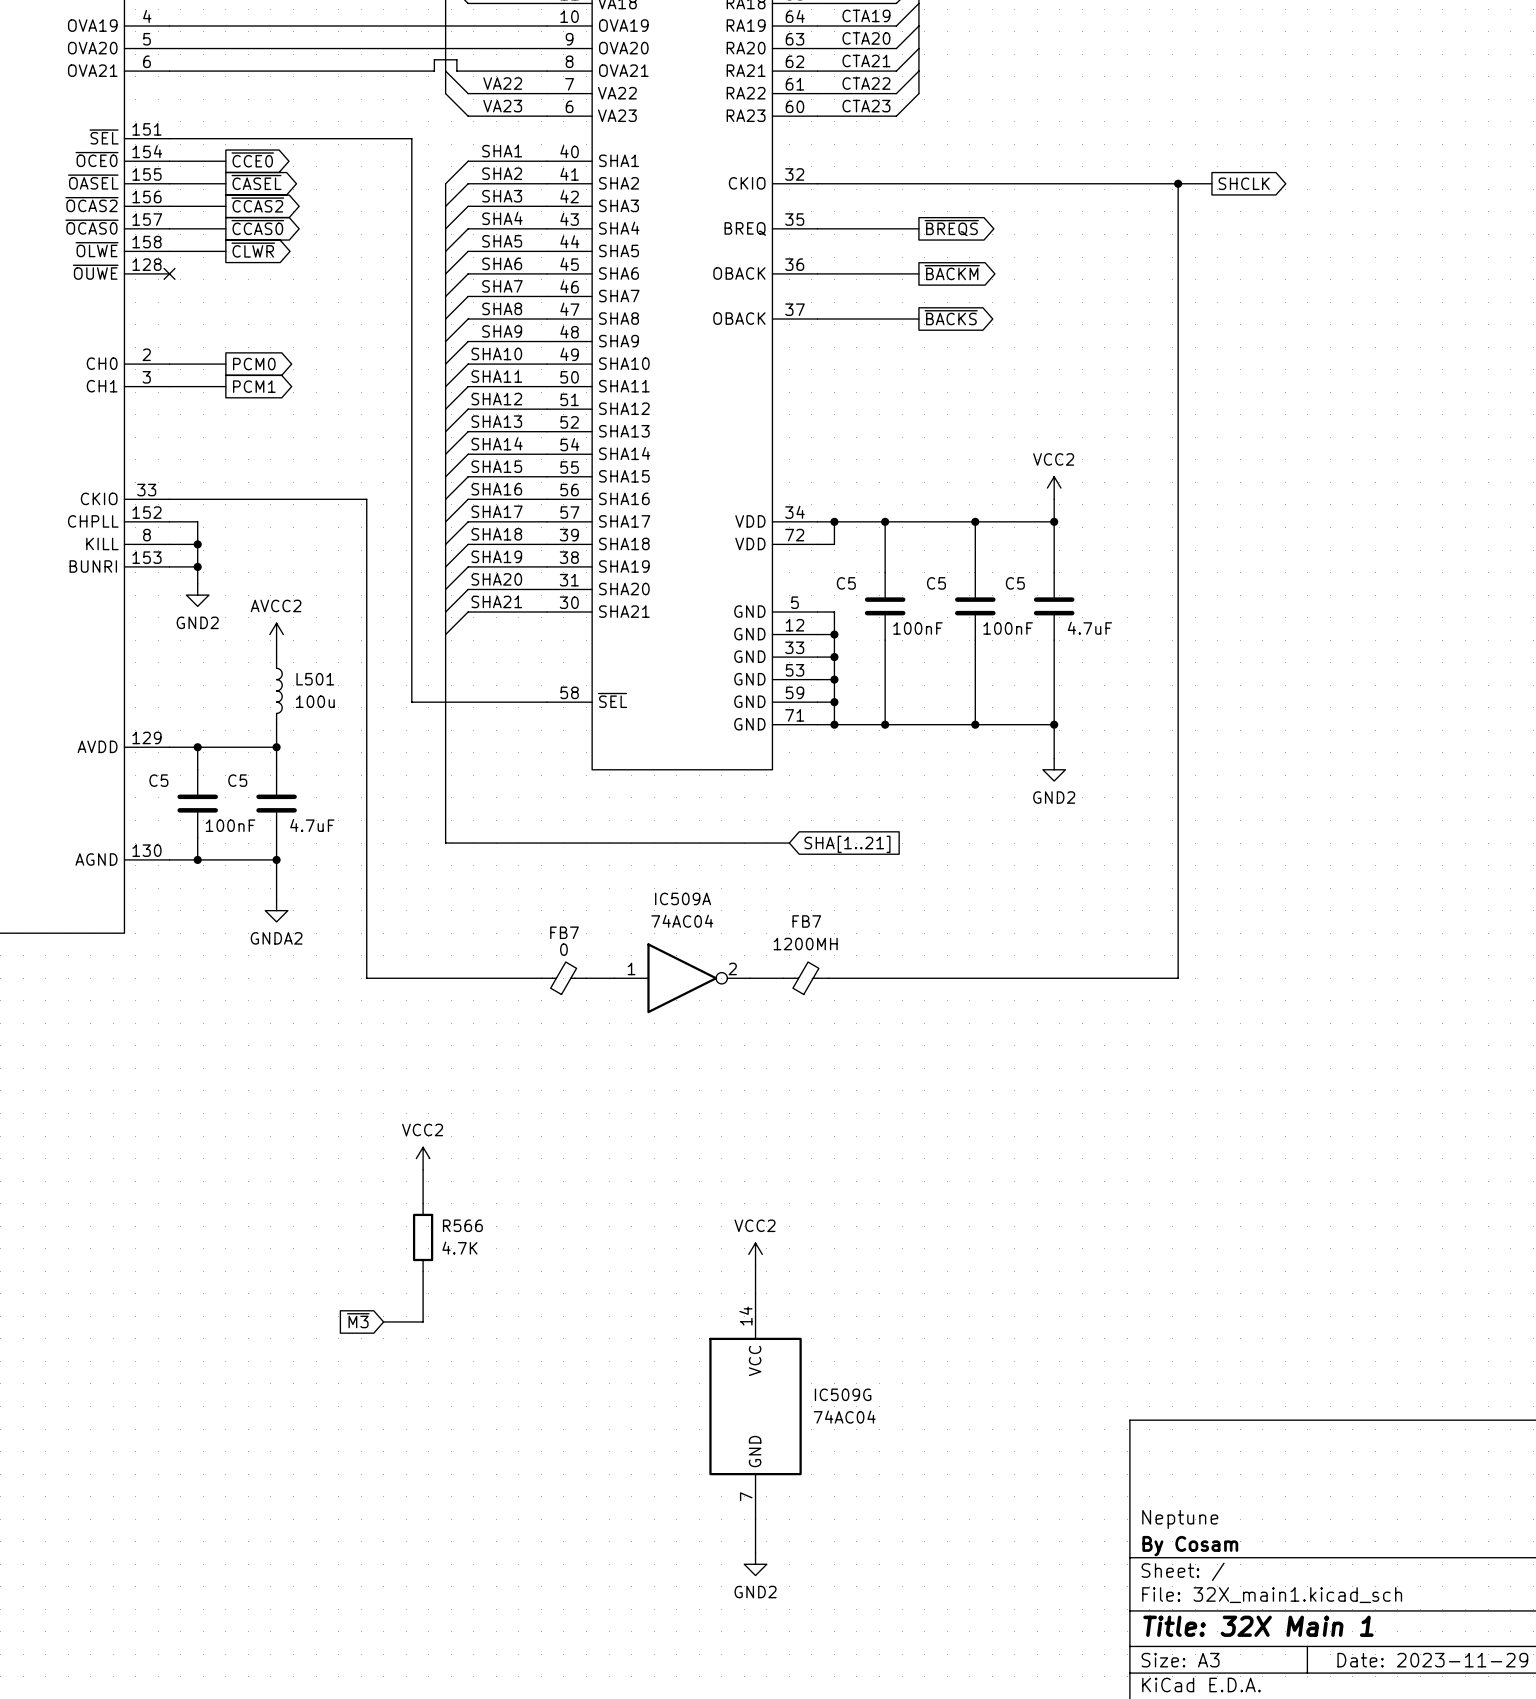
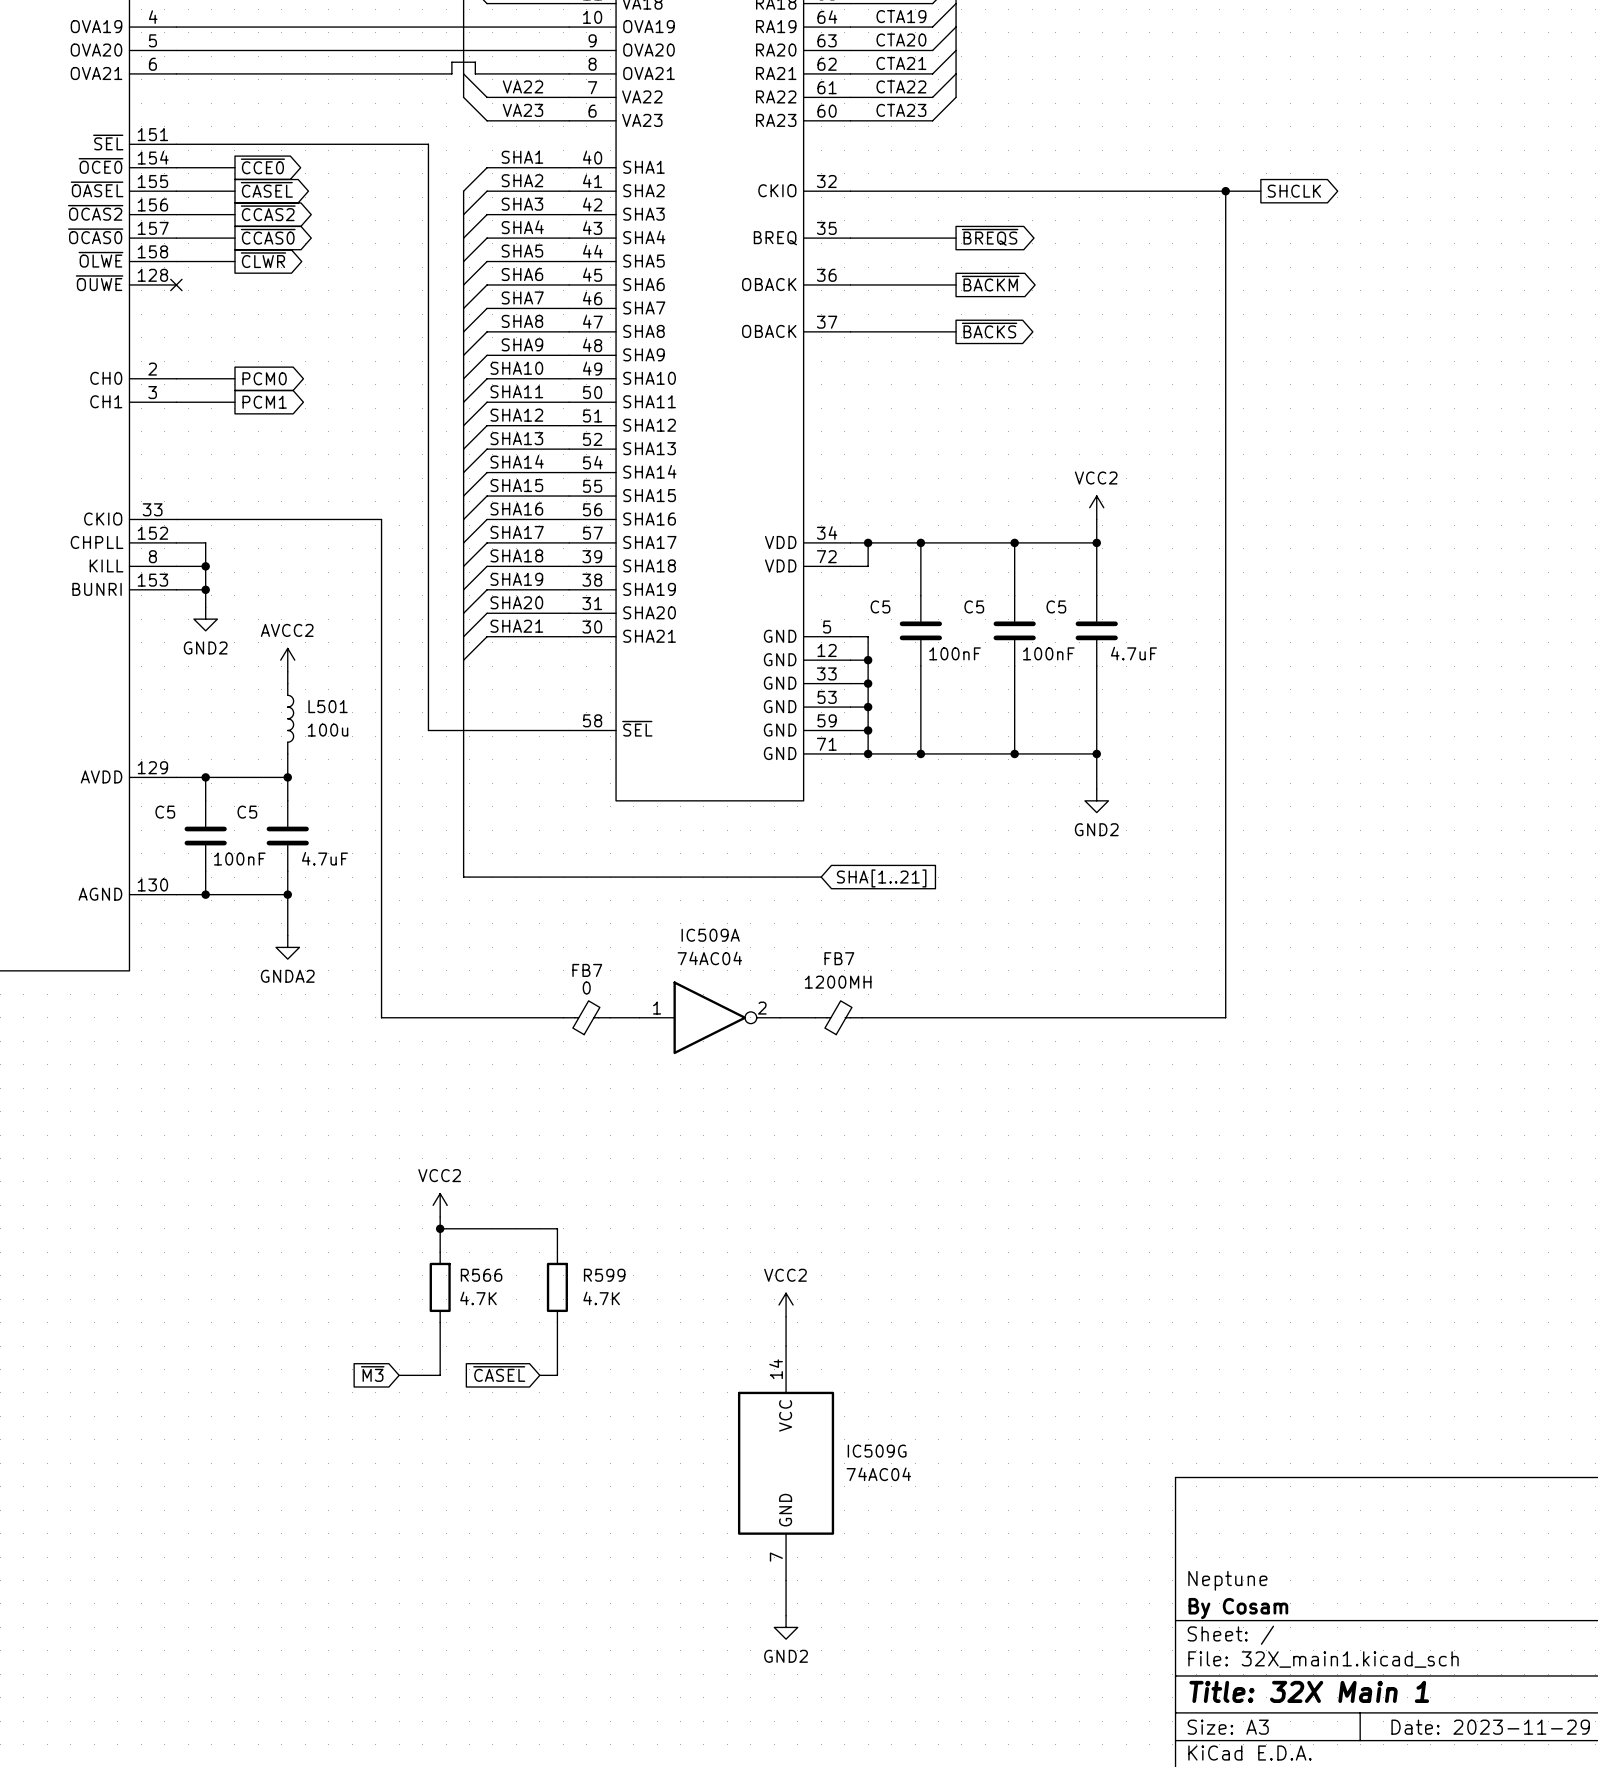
wire: none -> (440, 1228) (557, 1228) (557, 1252)
junction: none -> (440, 1228)
R599: none -> 4.7K (557, 1287)
wire: none -> (557, 1322) (557, 1375) (539, 1375)
global label: none -> ~{CASEL} (499, 1374)

